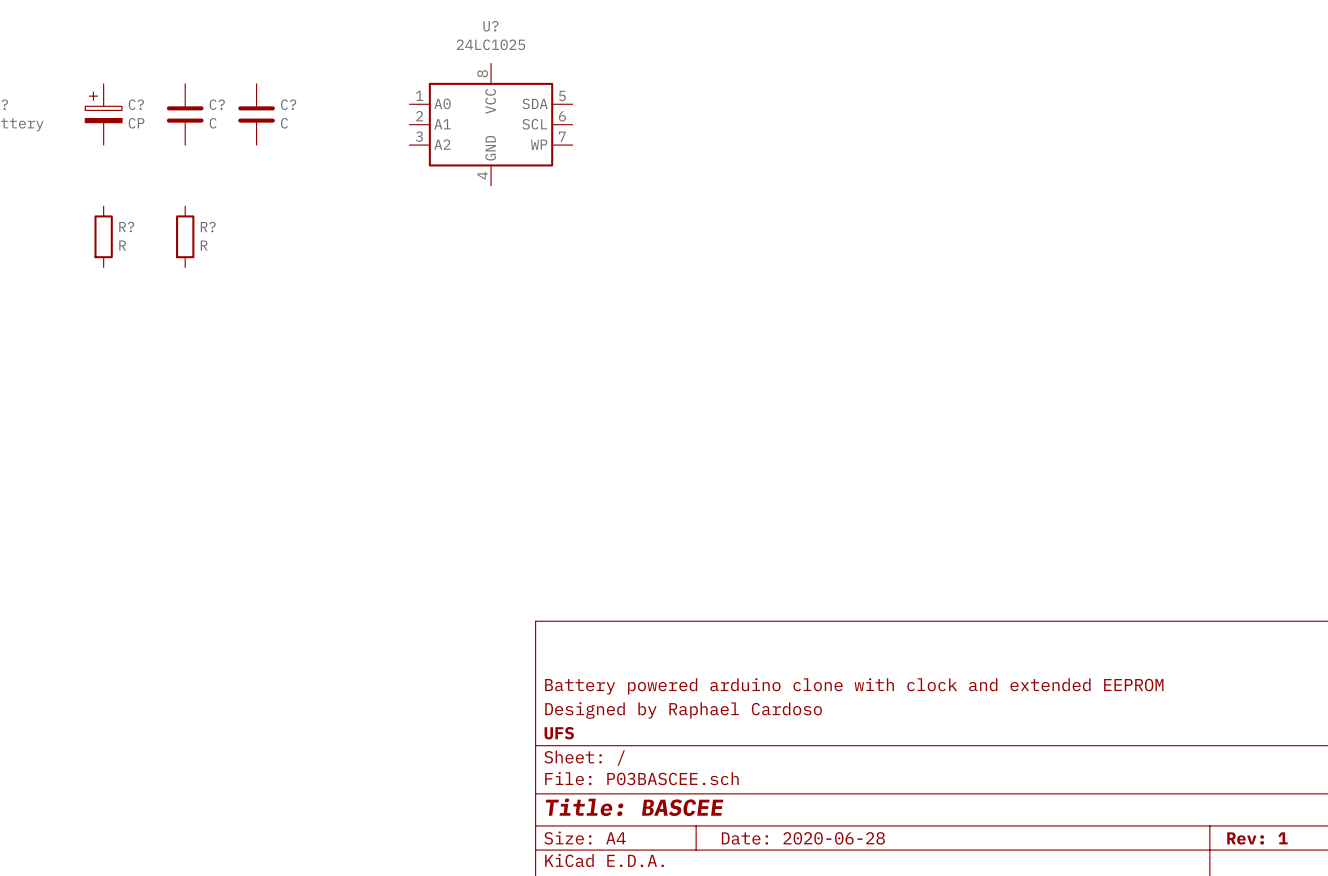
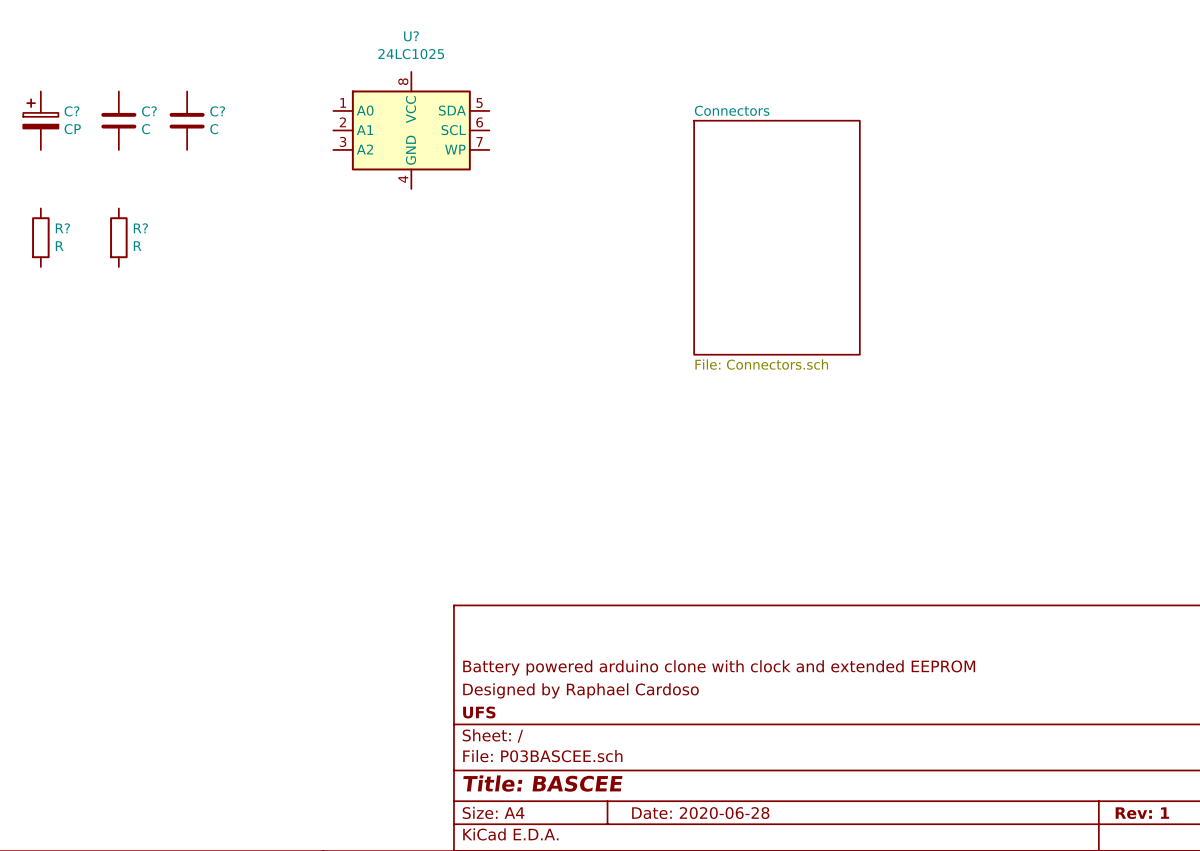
sheet Connectors: none -> File: Connectors.sch (776, 237)

